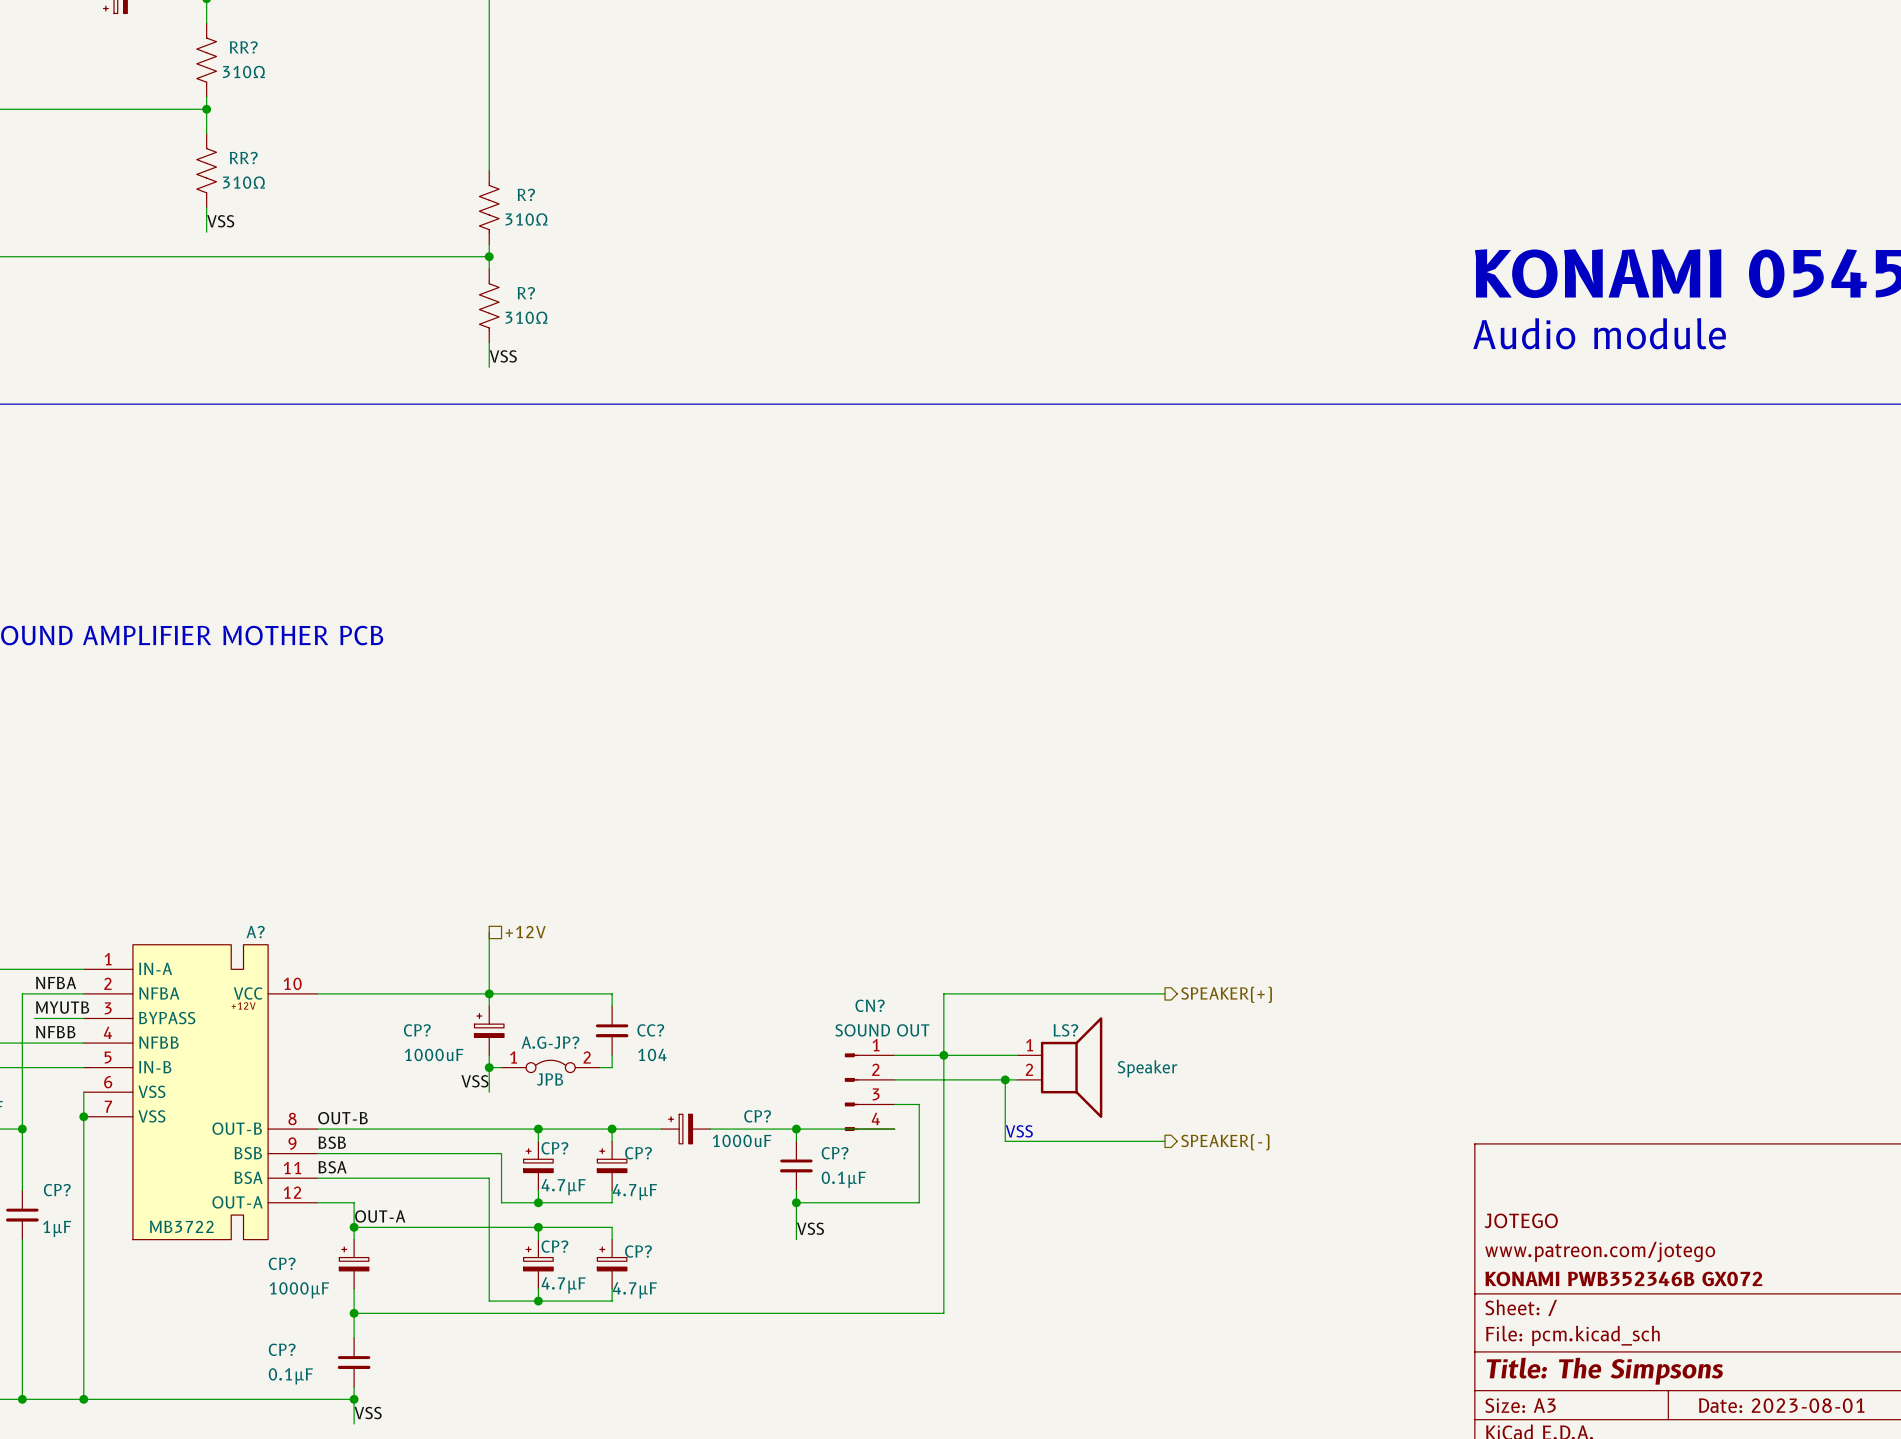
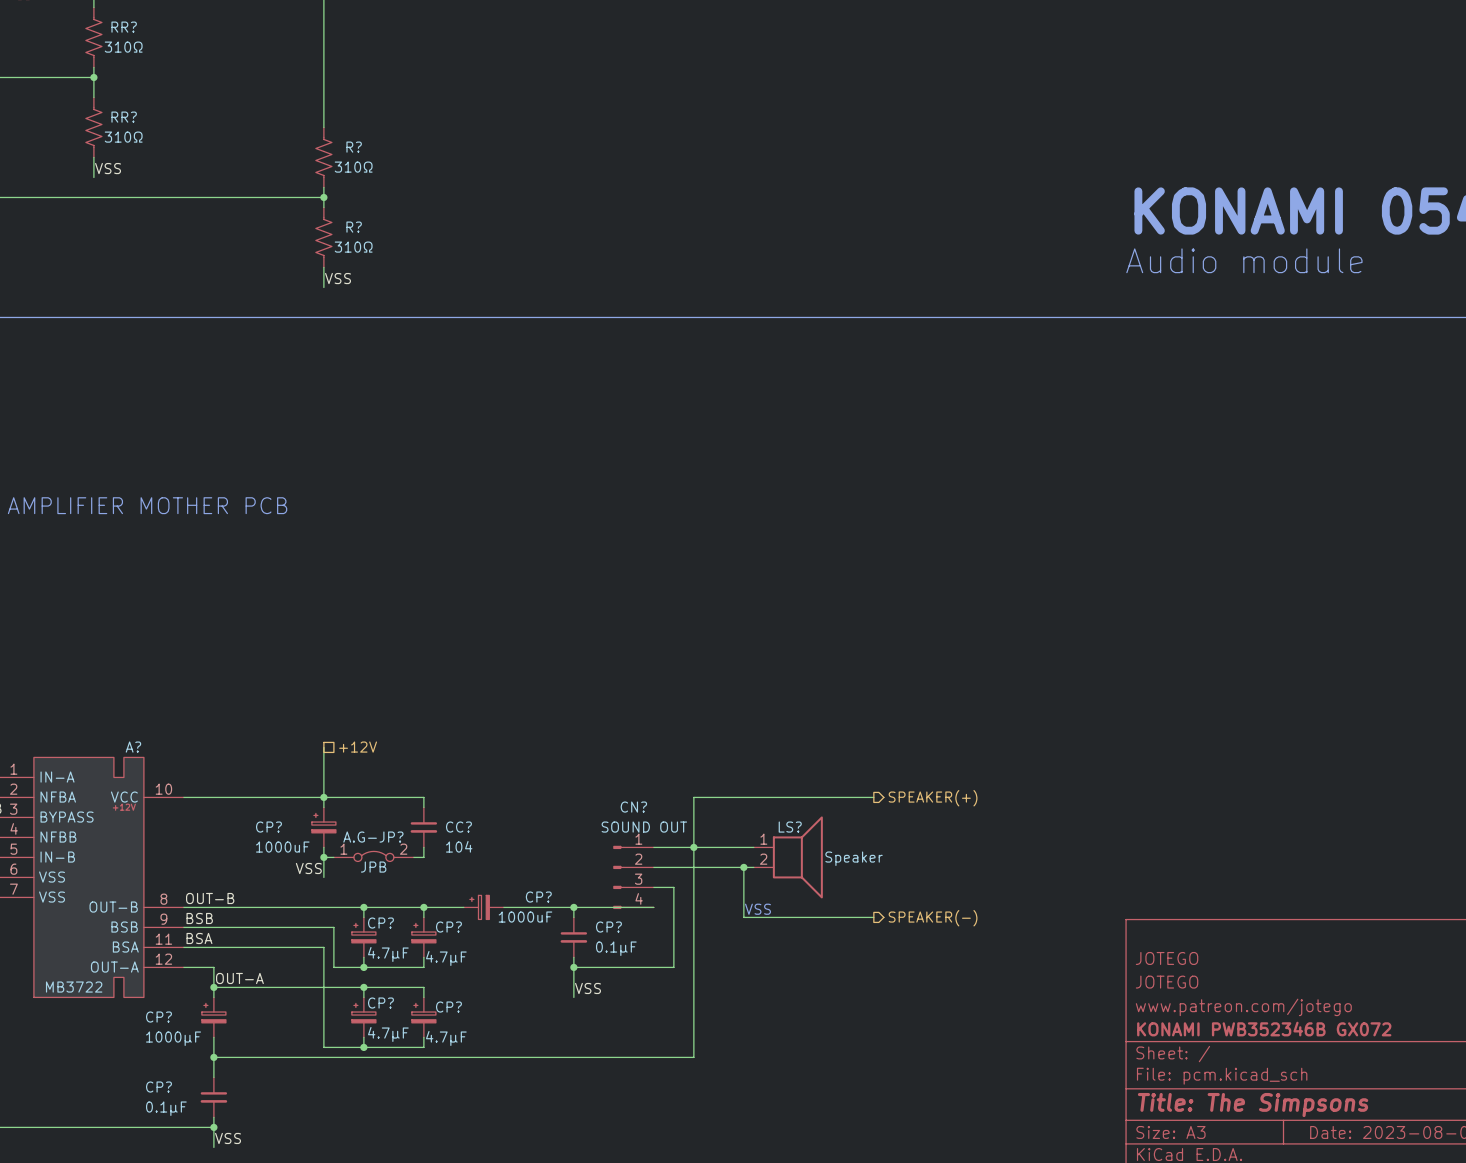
title block: none -> JOTEGO (1167, 958)

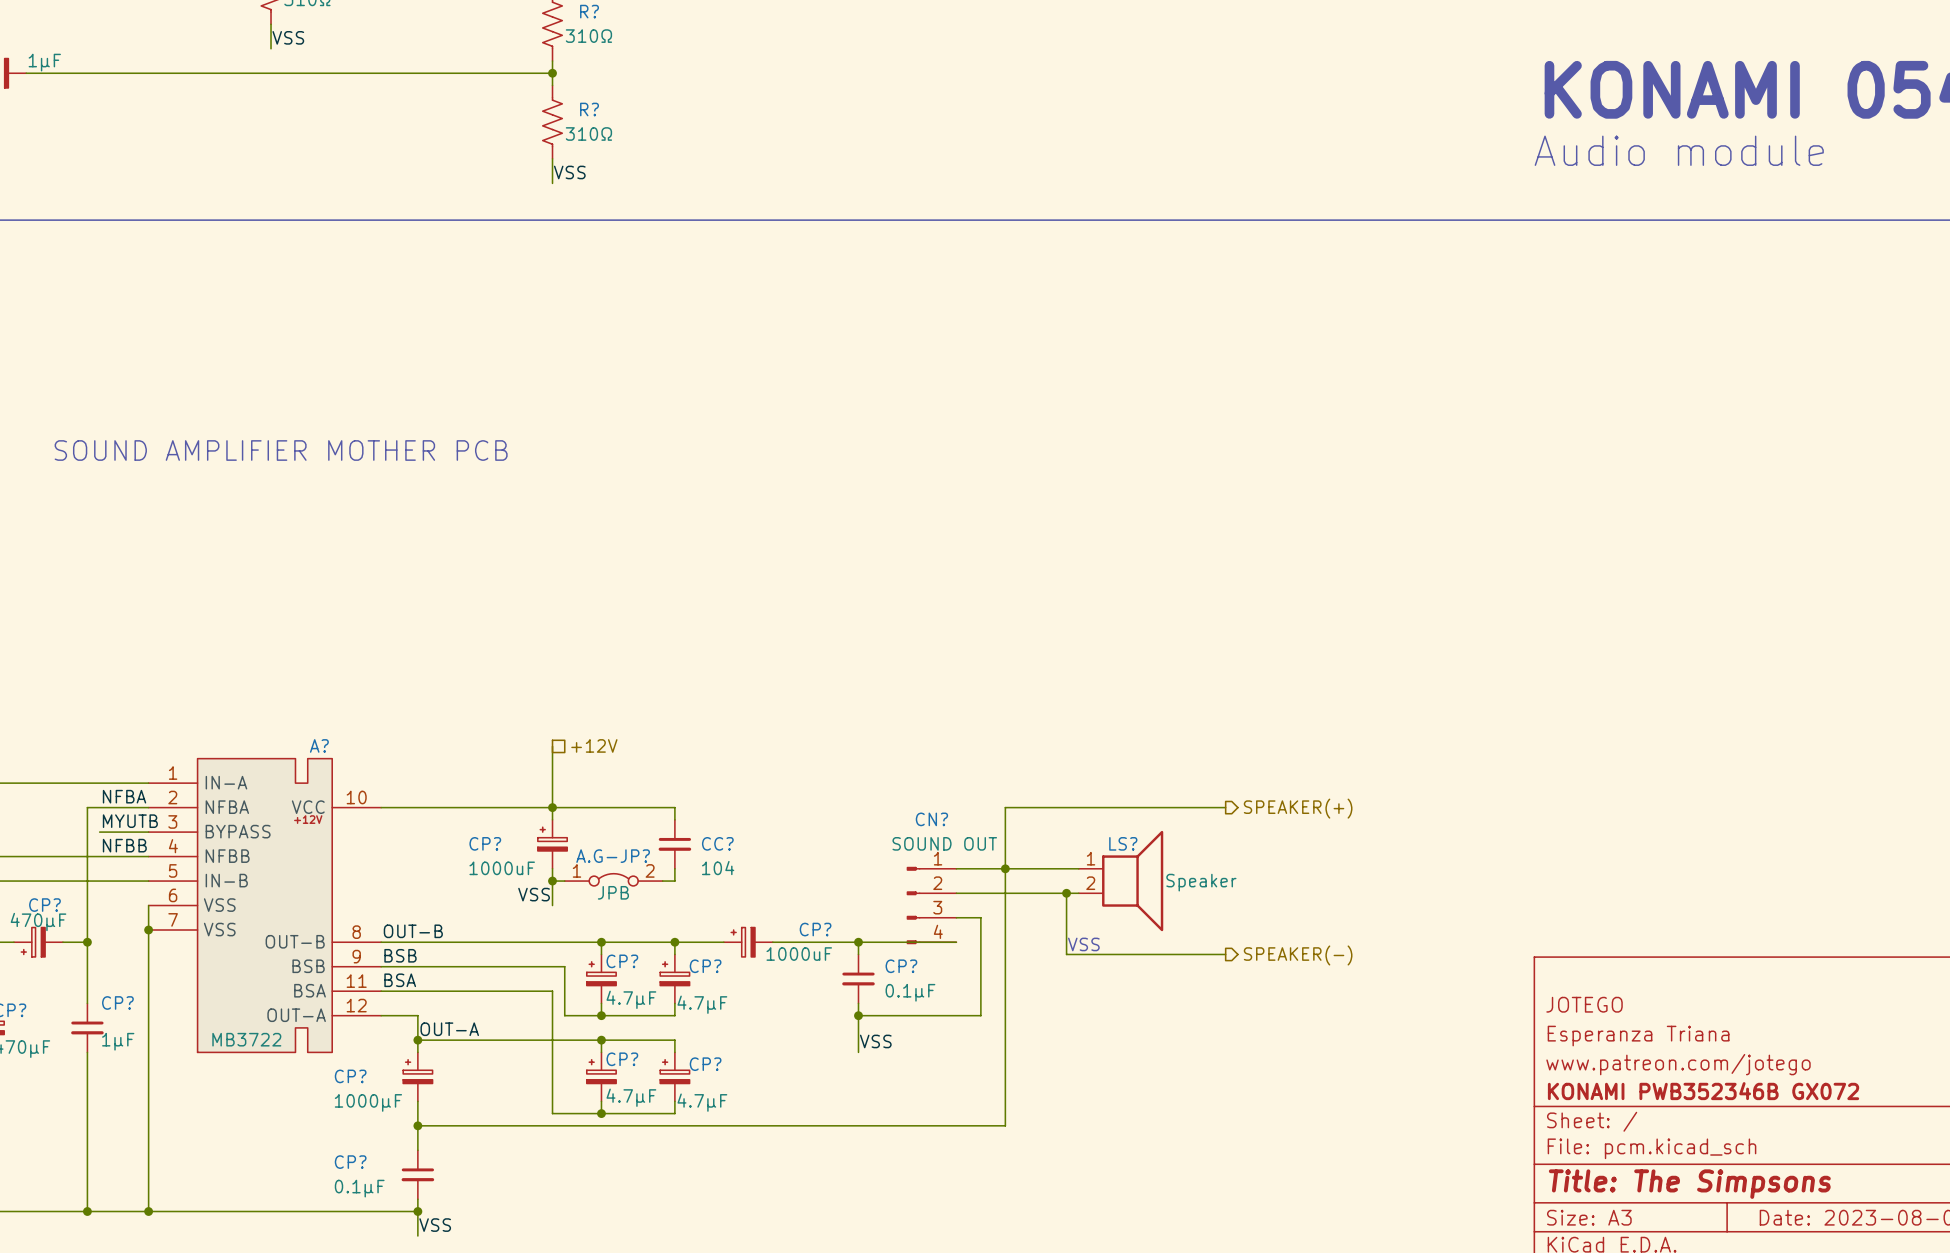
title block: JOTEGO (1167, 982) -> Esperanza Triana (1638, 1036)

